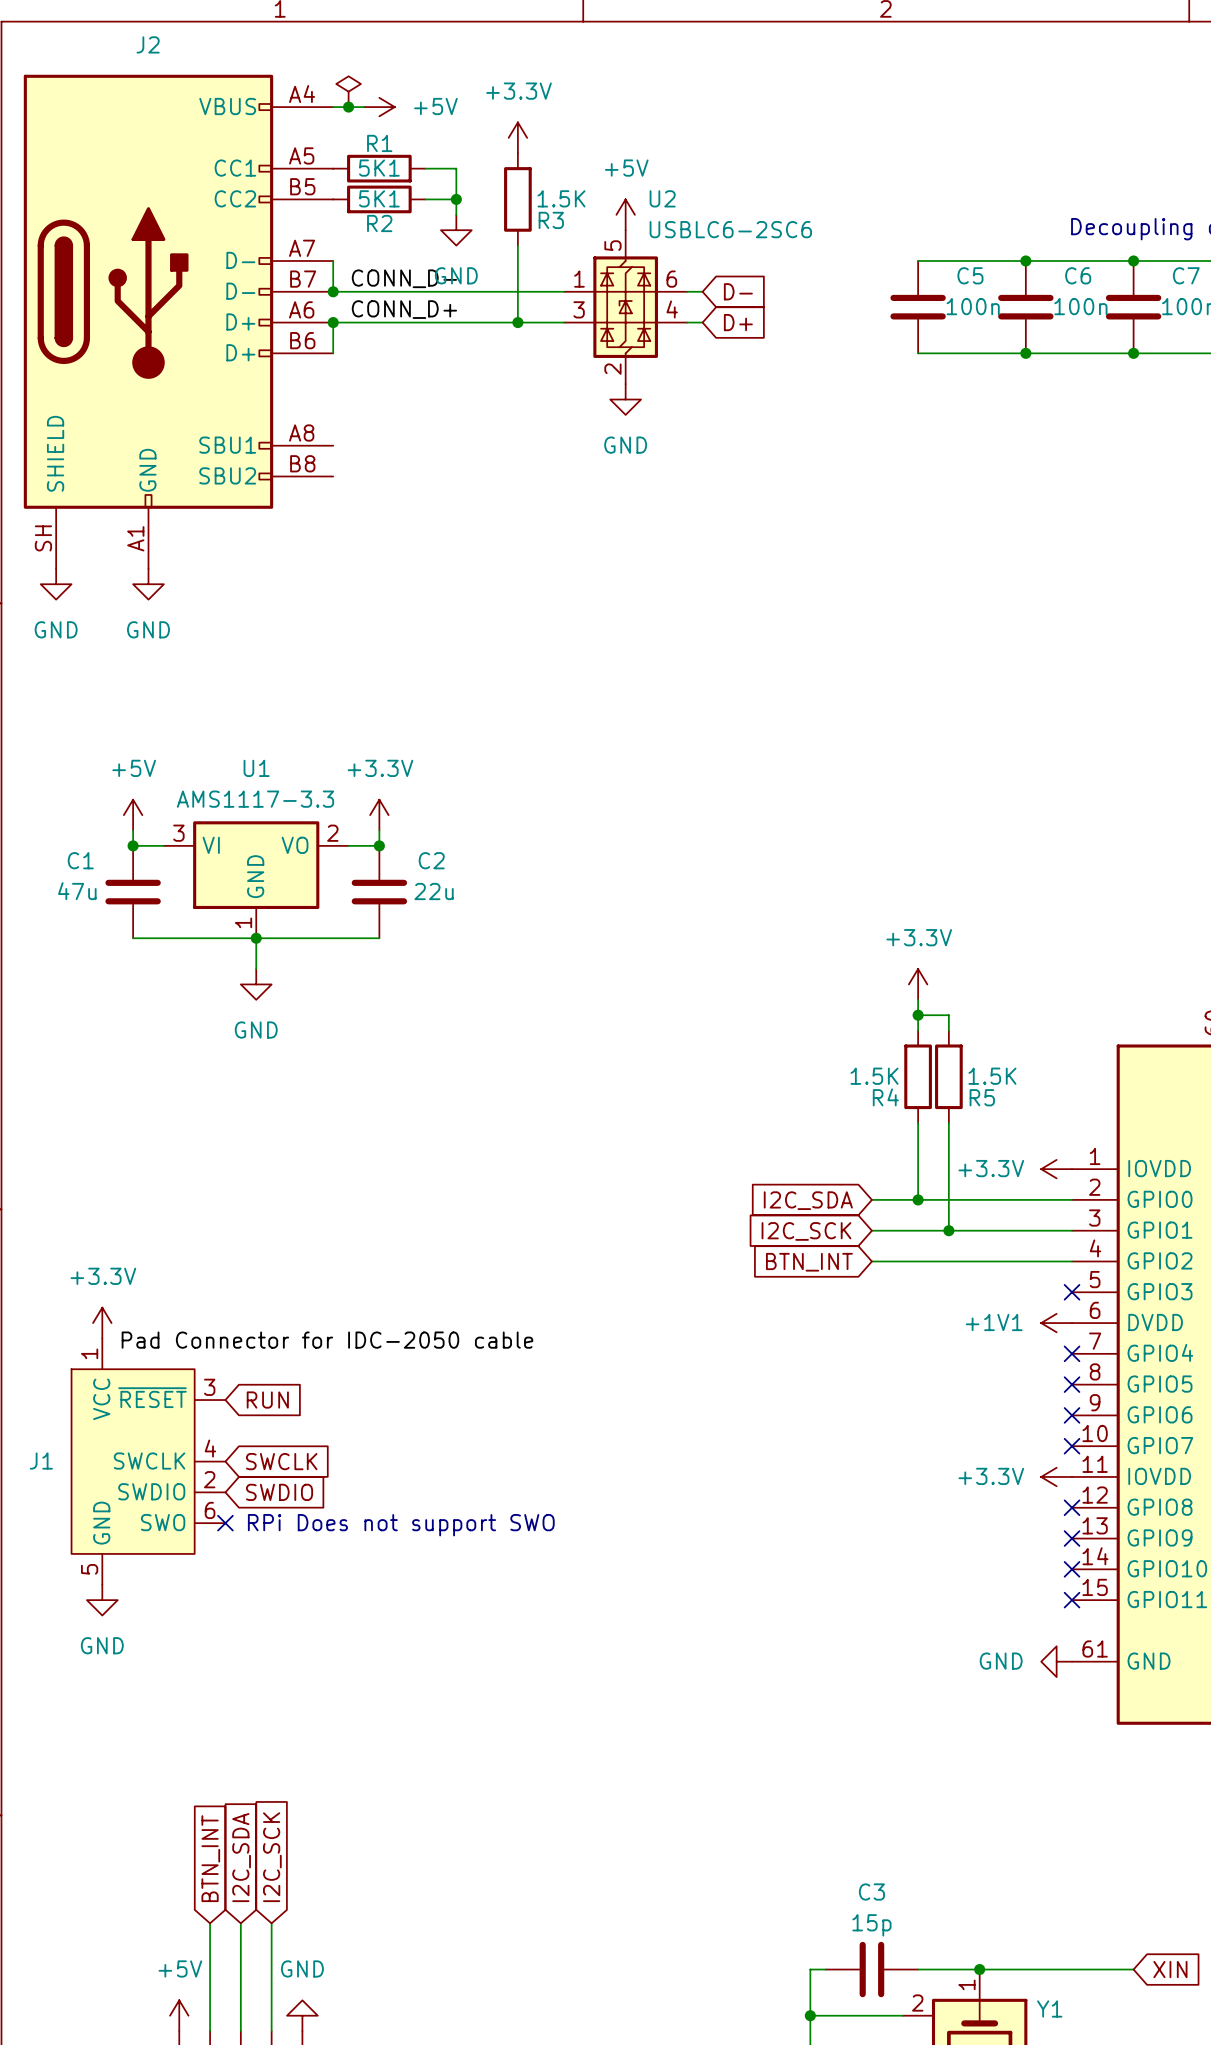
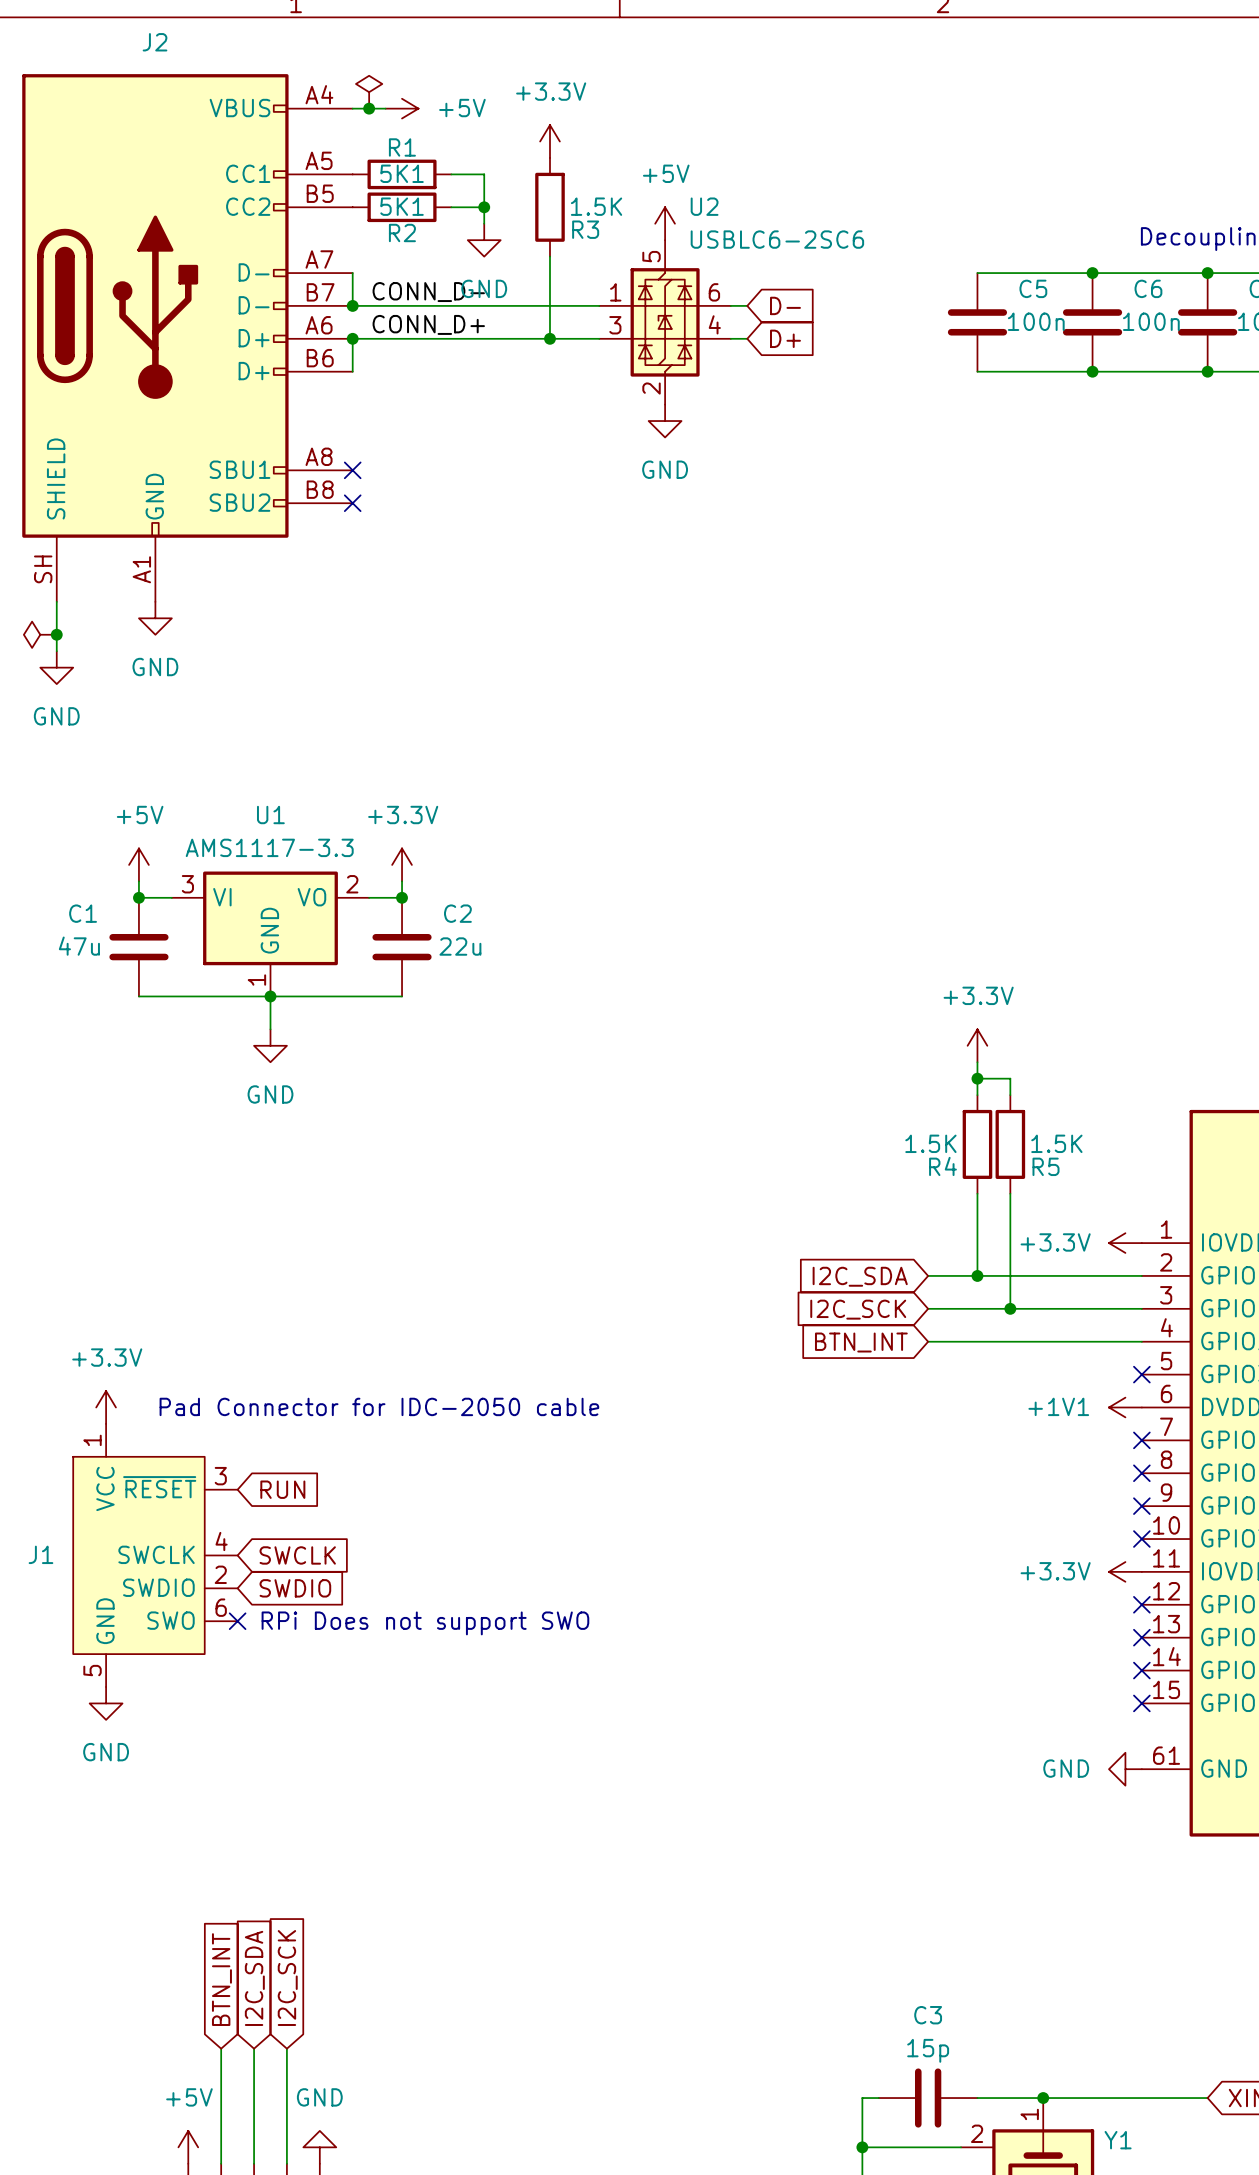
no-connect mark: none -> (352, 470)
no-connect mark: none -> (352, 503)
wire: none -> (56, 601) (56, 651)
power symbol position: GND (56, 584) -> GND (56, 667)
power symbol: none -> (40, 634)
junction: none -> (56, 634)
text: none -> Pad Connector for IDC-2050 cable (379, 1406)
label: Pad Connector for IDC-2050 cable (327, 1340) -> none

